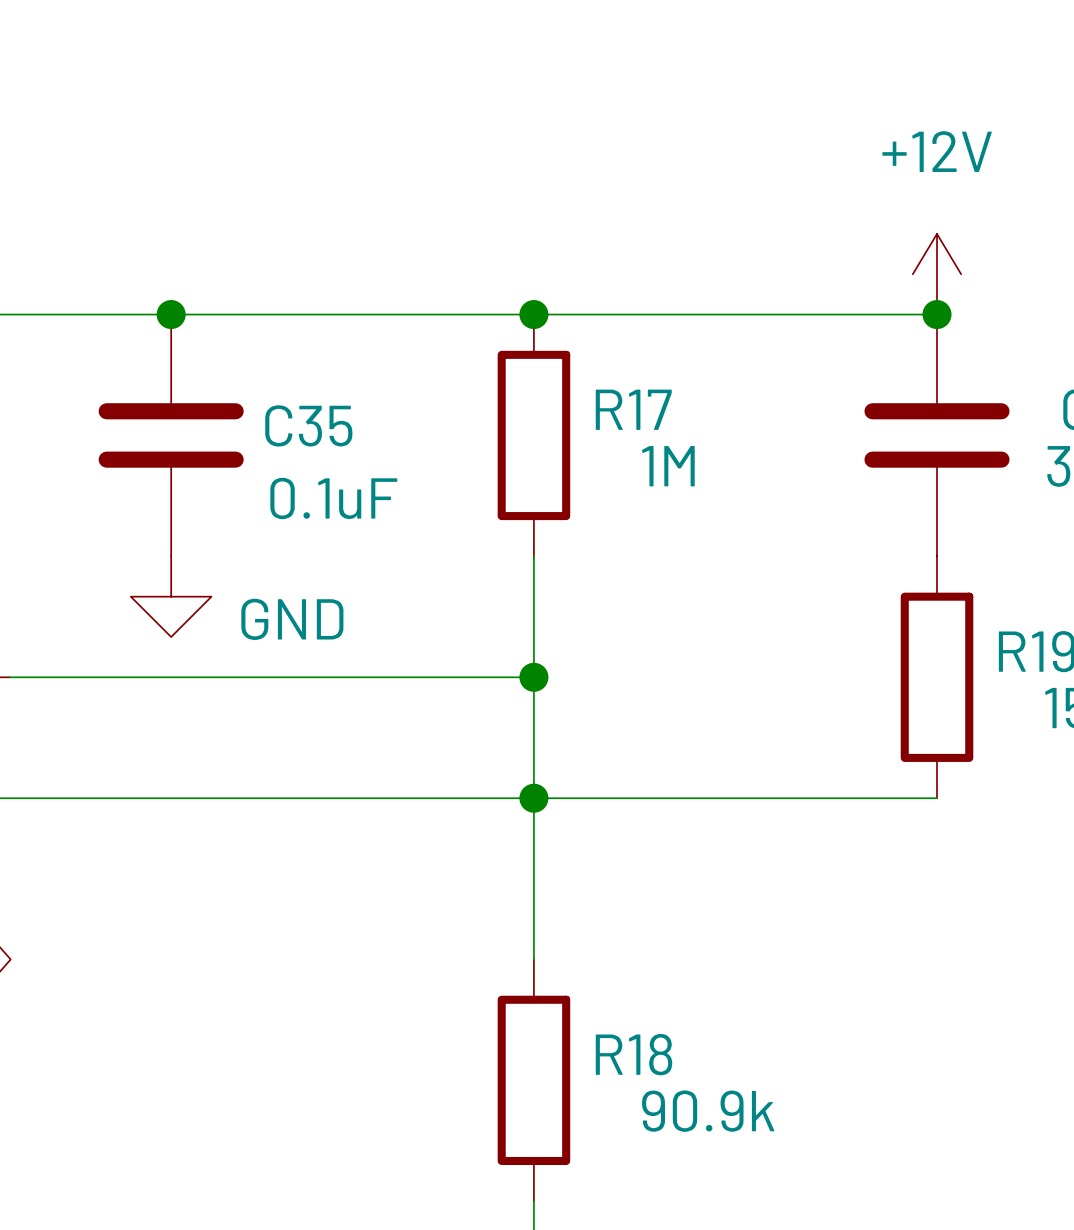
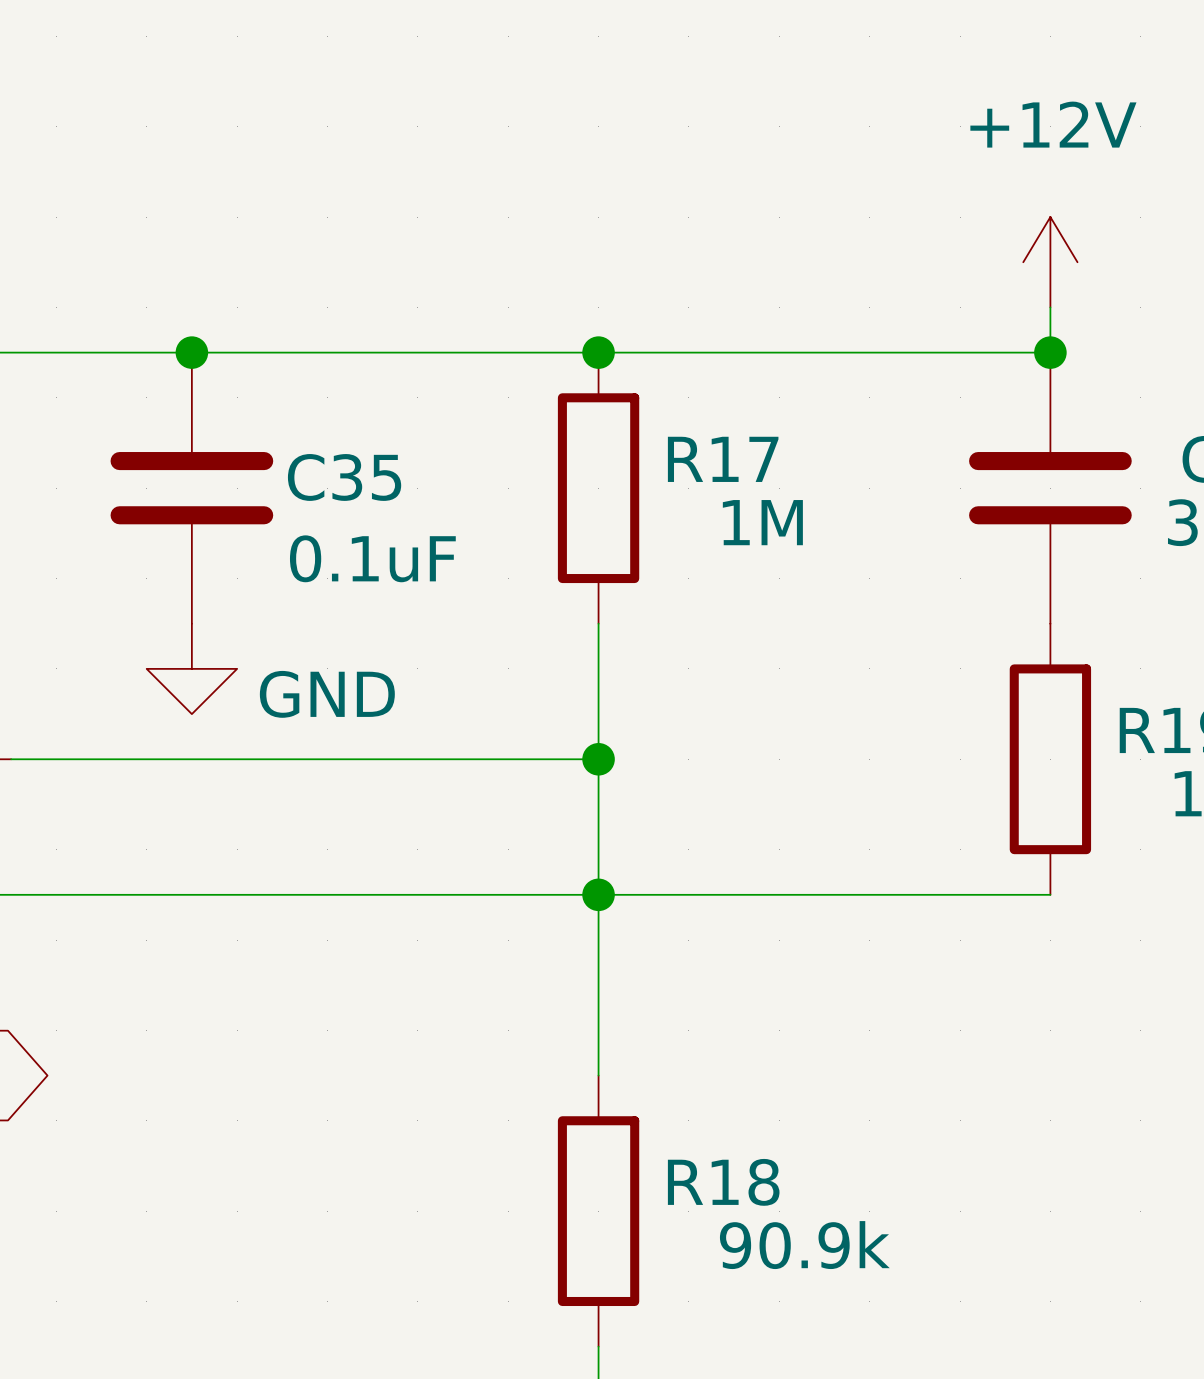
power symbol position: +12V (937, 274) -> +12V (1050, 262)

